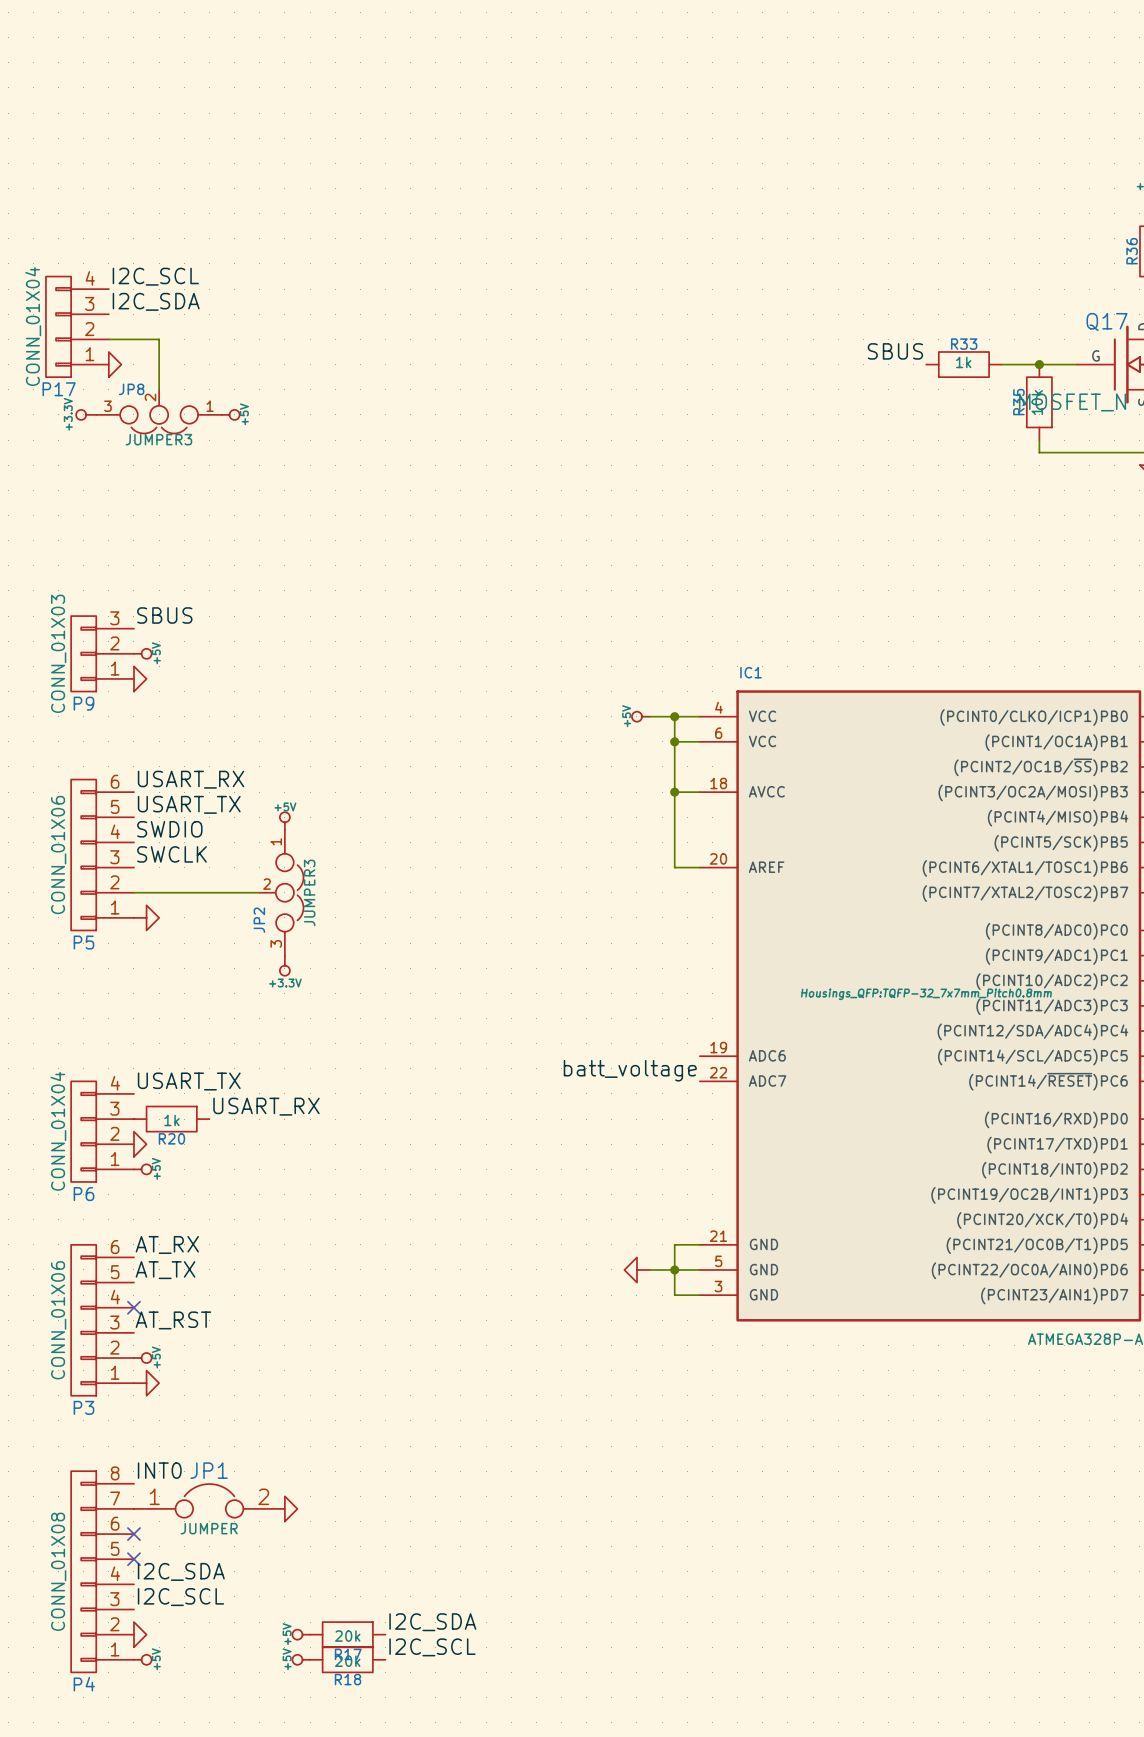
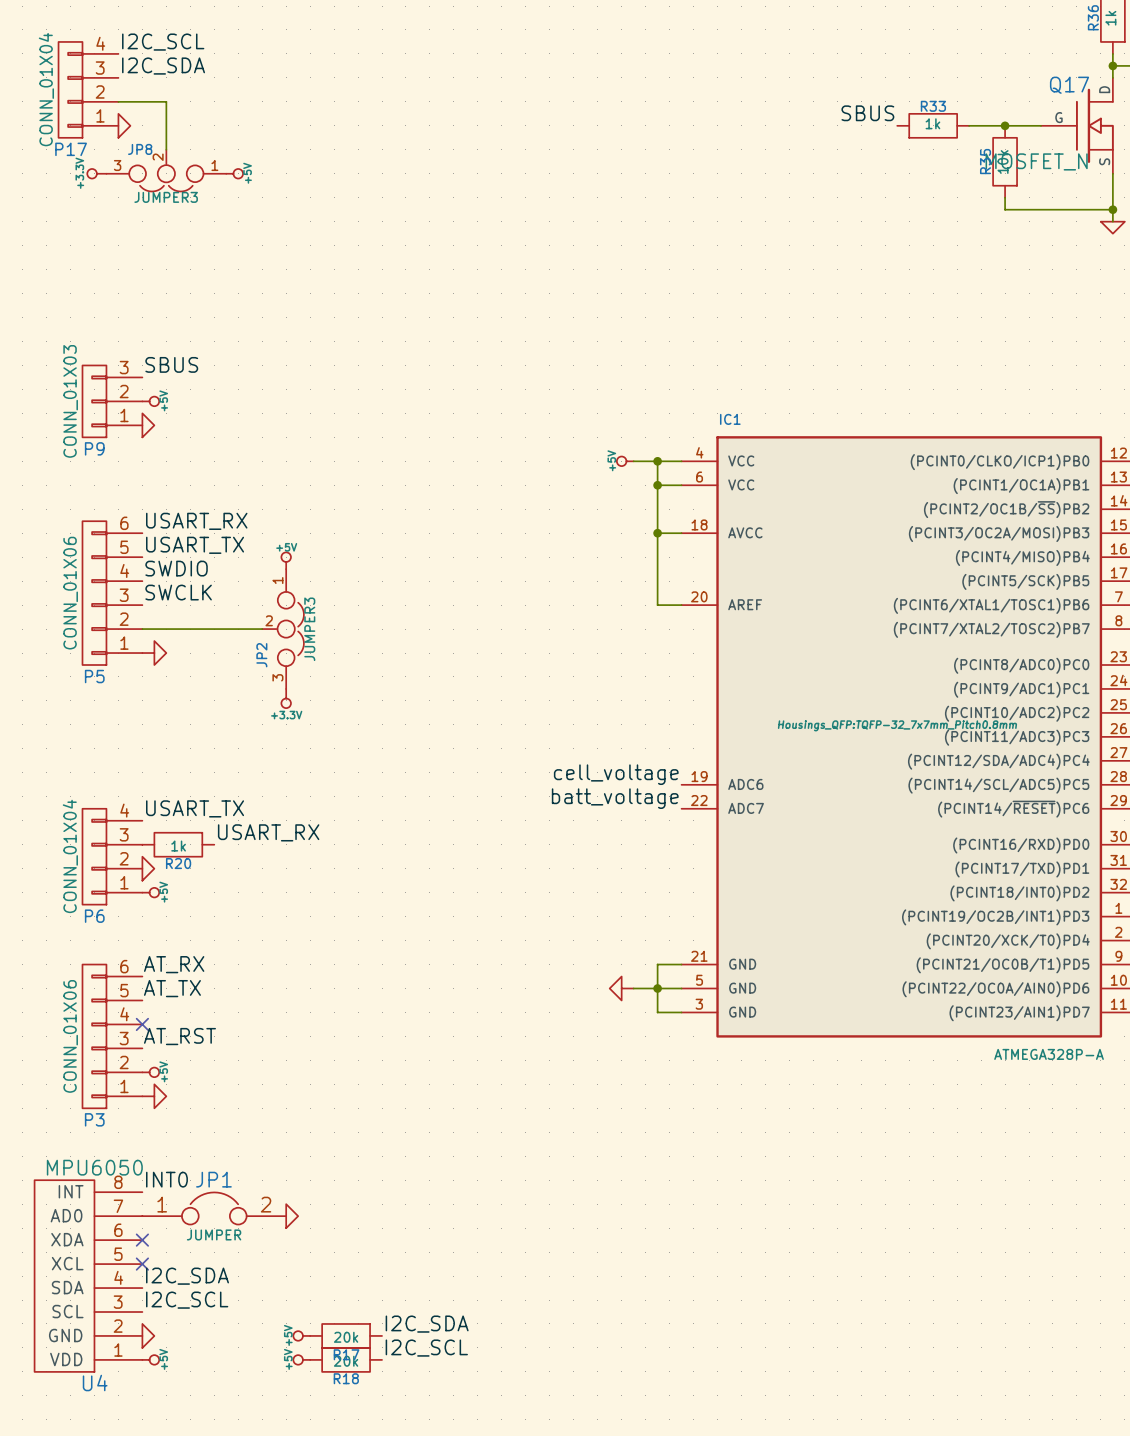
label: none -> cell_voltage (616, 774)
U4: none -> MPU6050 (88, 1276)
P4: CONN_01X08 (102, 1571) -> none

